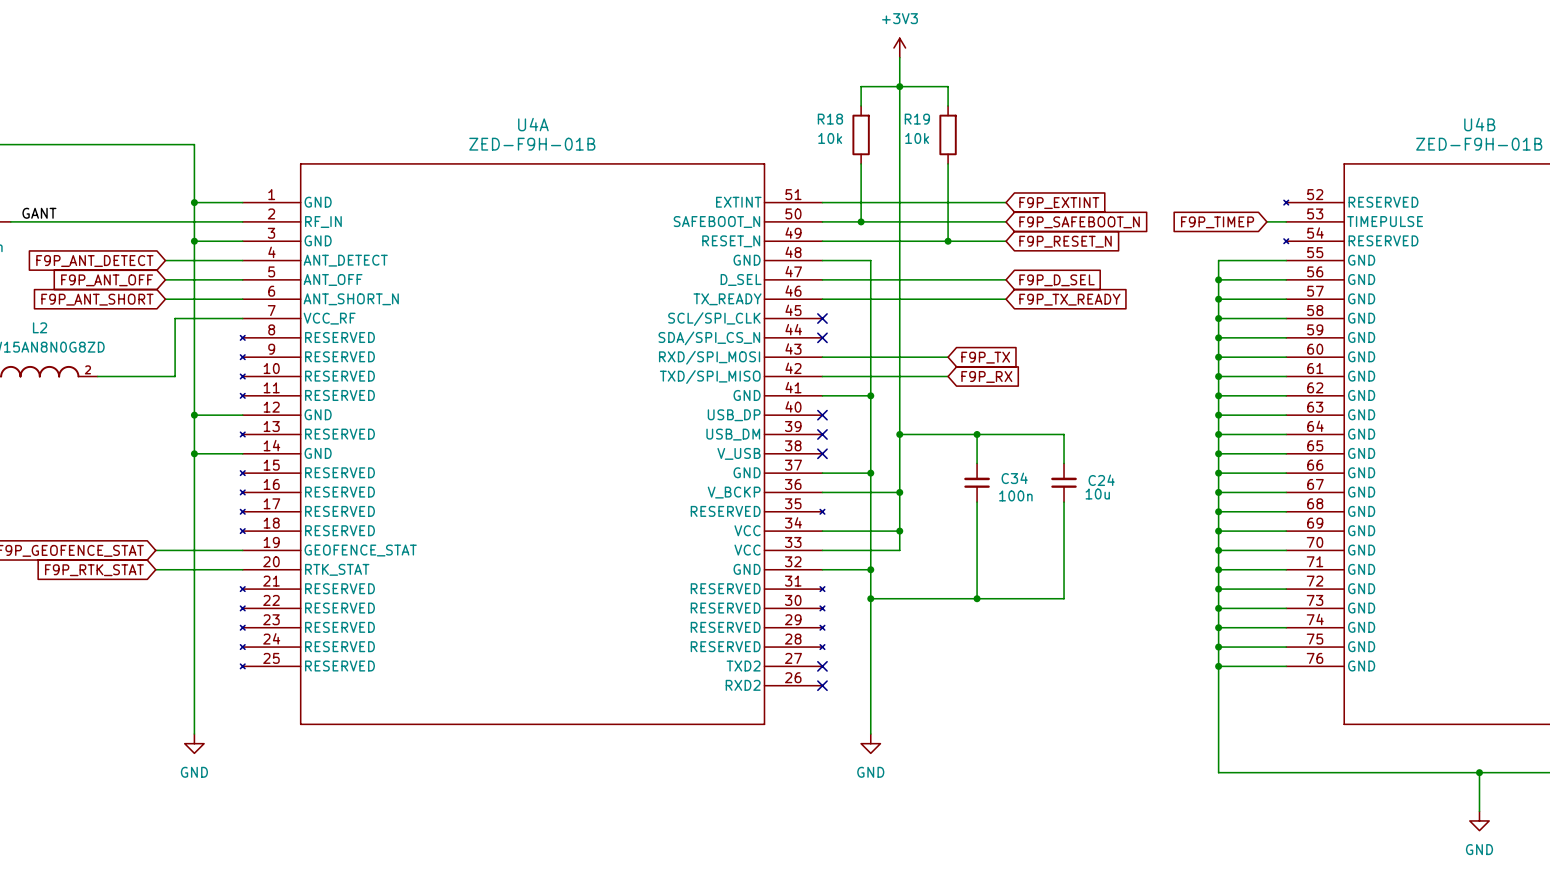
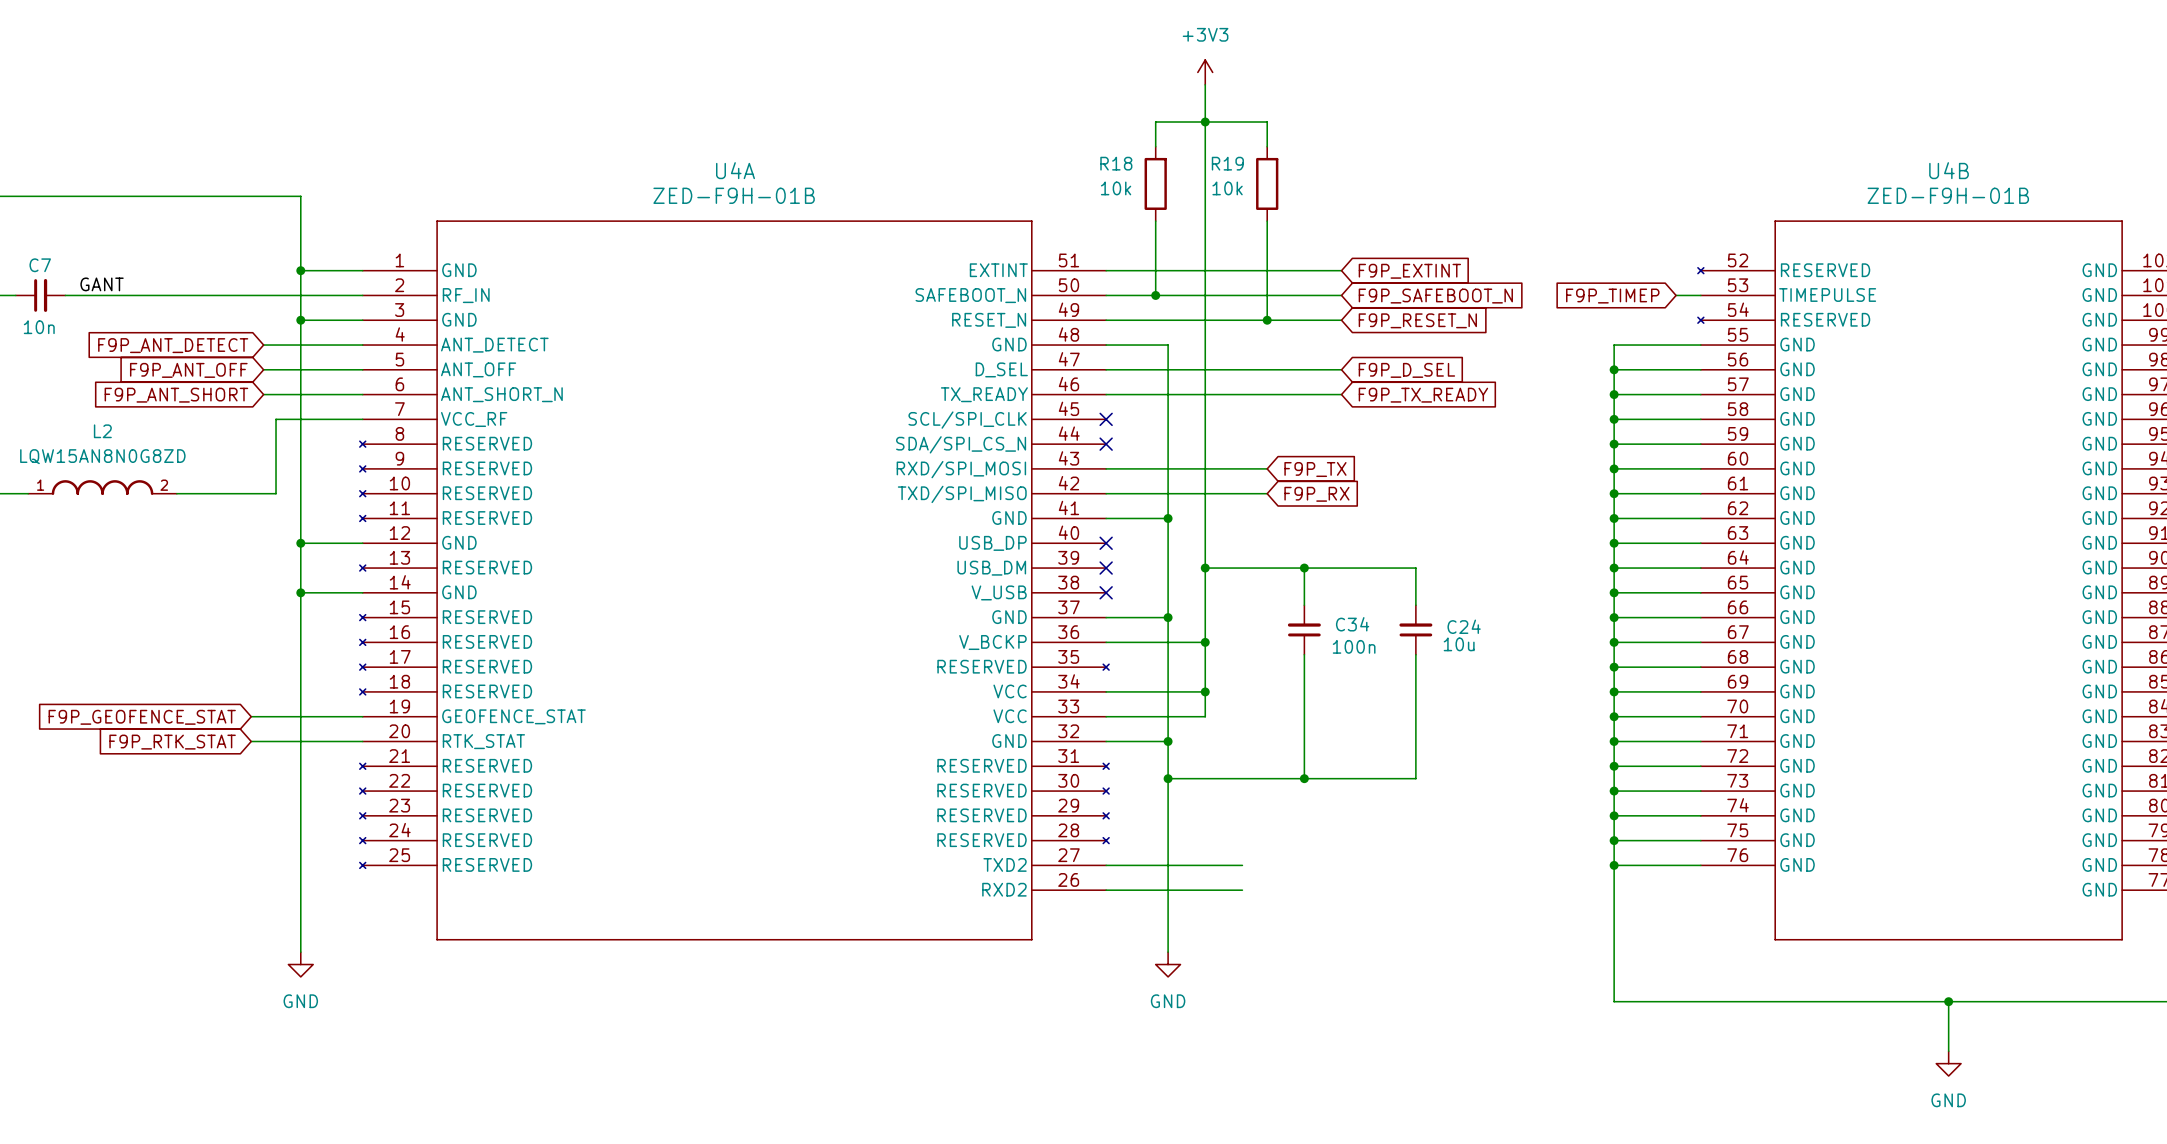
wire: none -> (1106, 865) (1242, 865)
no-connect mark: (822, 666) -> none
wire: none -> (1106, 890) (1242, 890)
no-connect mark: (822, 685) -> none

